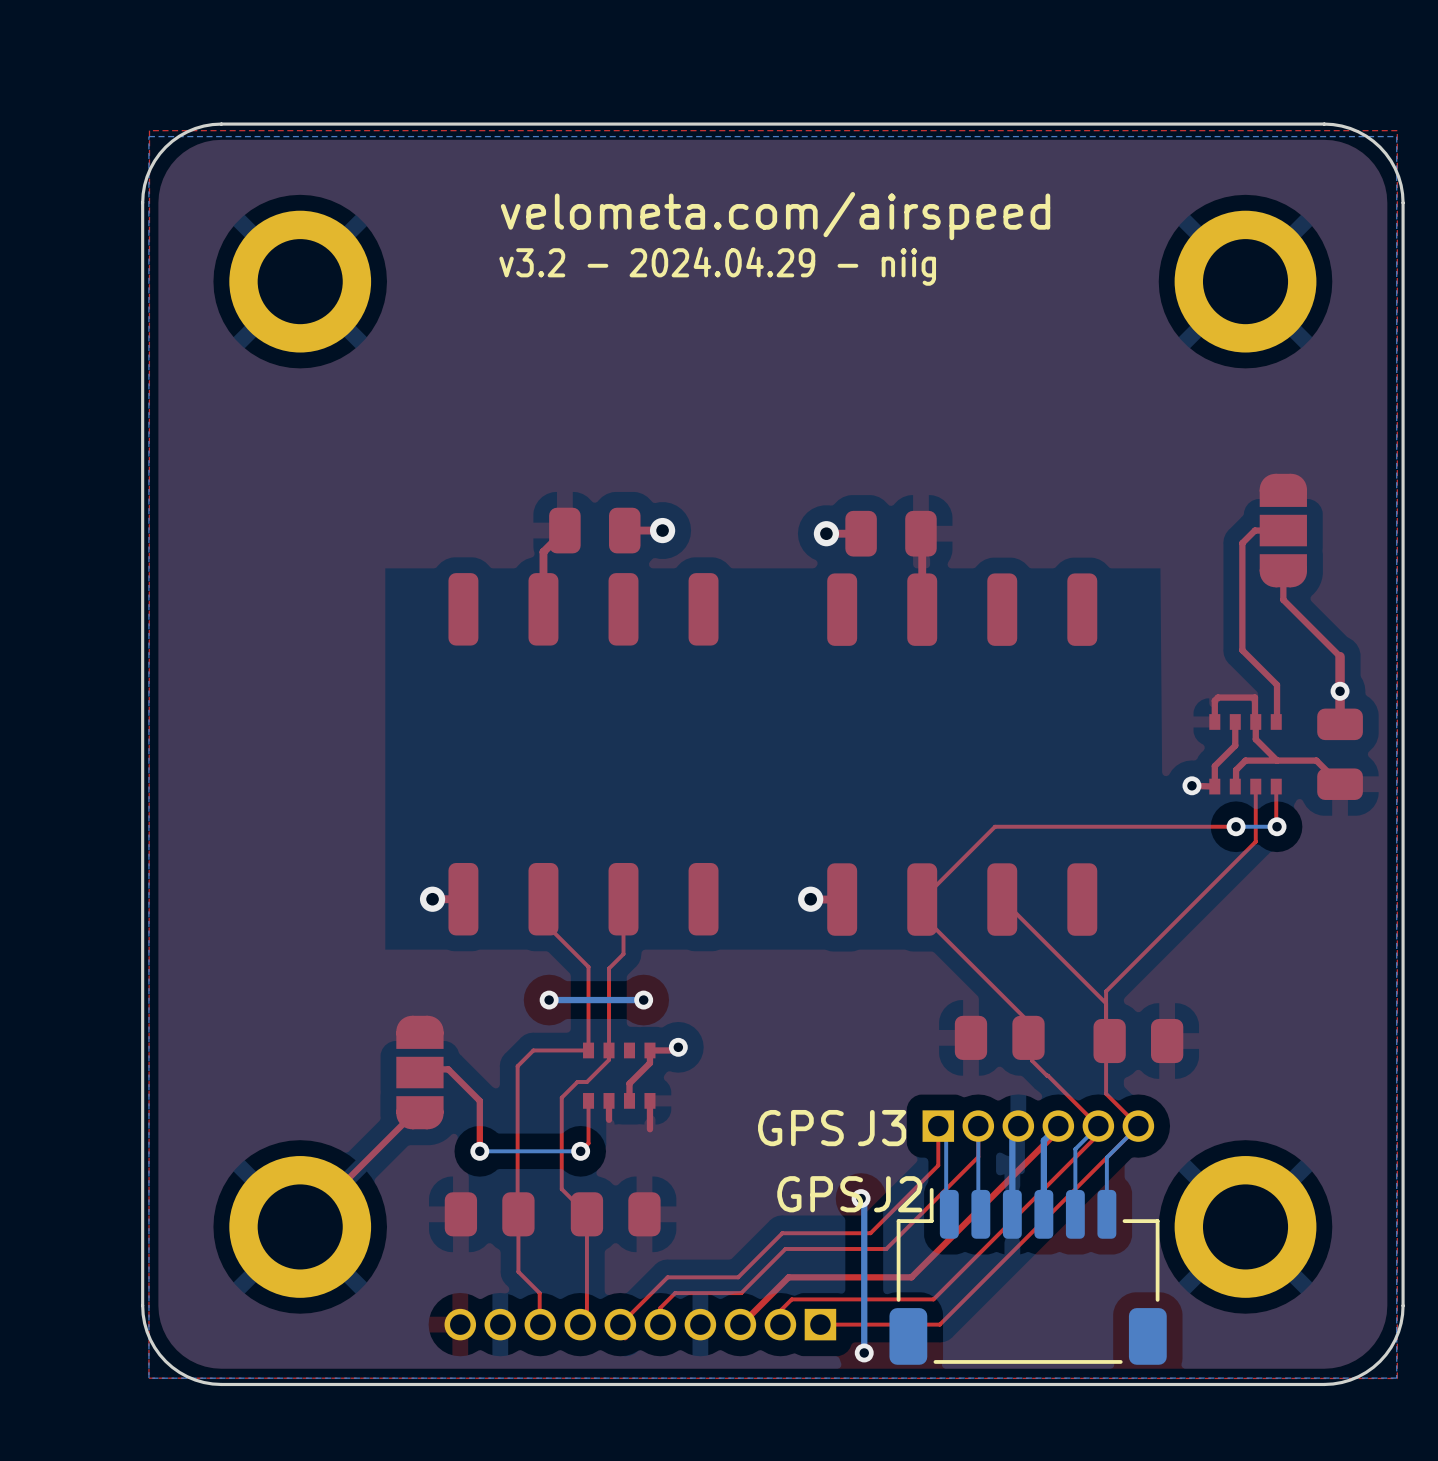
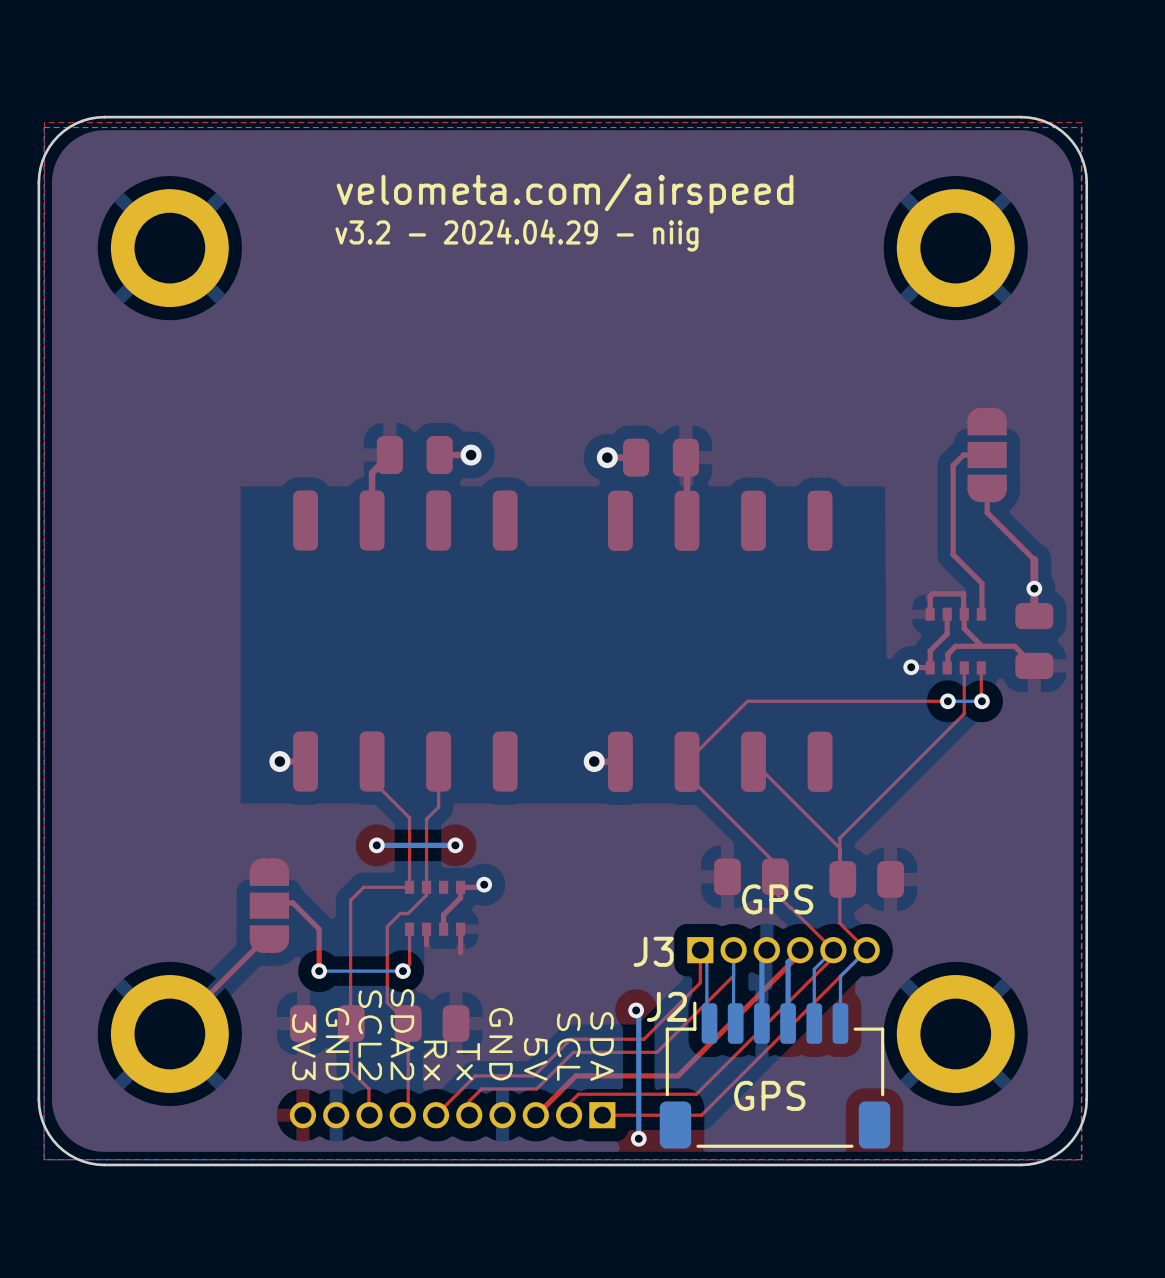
J3 value position: GPS (800, 1128) -> GPS (777, 899)
J2 value position: GPS (820, 1194) -> GPS (769, 1095)
text: none -> SDA2 (402, 1034)
text: none -> SCL2 (370, 1035)
text: none -> GND (337, 1044)
text: none -> GND (500, 1044)
text: none -> 3V3 (303, 1047)
text: none -> SCL (568, 1047)
text: none -> SDA (602, 1046)
text: none -> 5V (535, 1059)
text: none -> Rx (435, 1060)
text: none -> Tx (468, 1061)

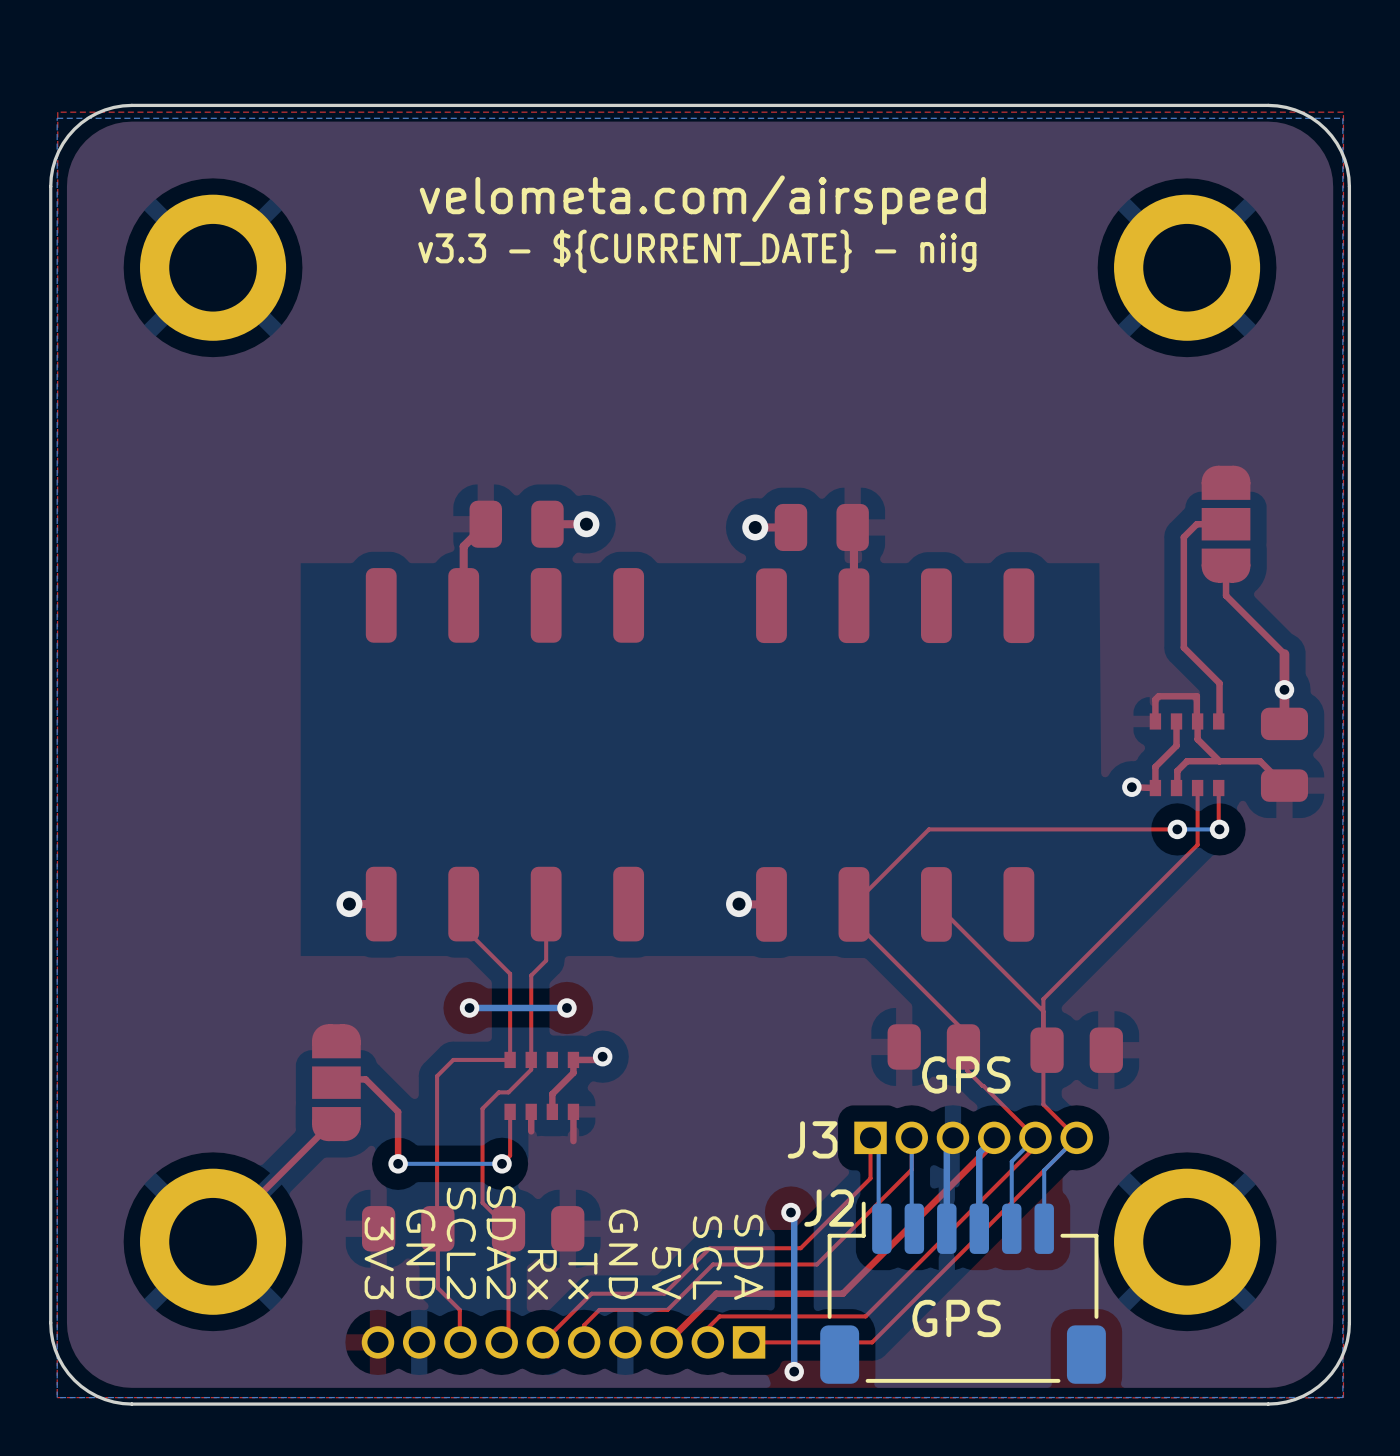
text: v3.2 - 2024.04.29 - niig (516, 235) -> v3.3 - ${CURRENT_DATE} - niig (697, 251)

